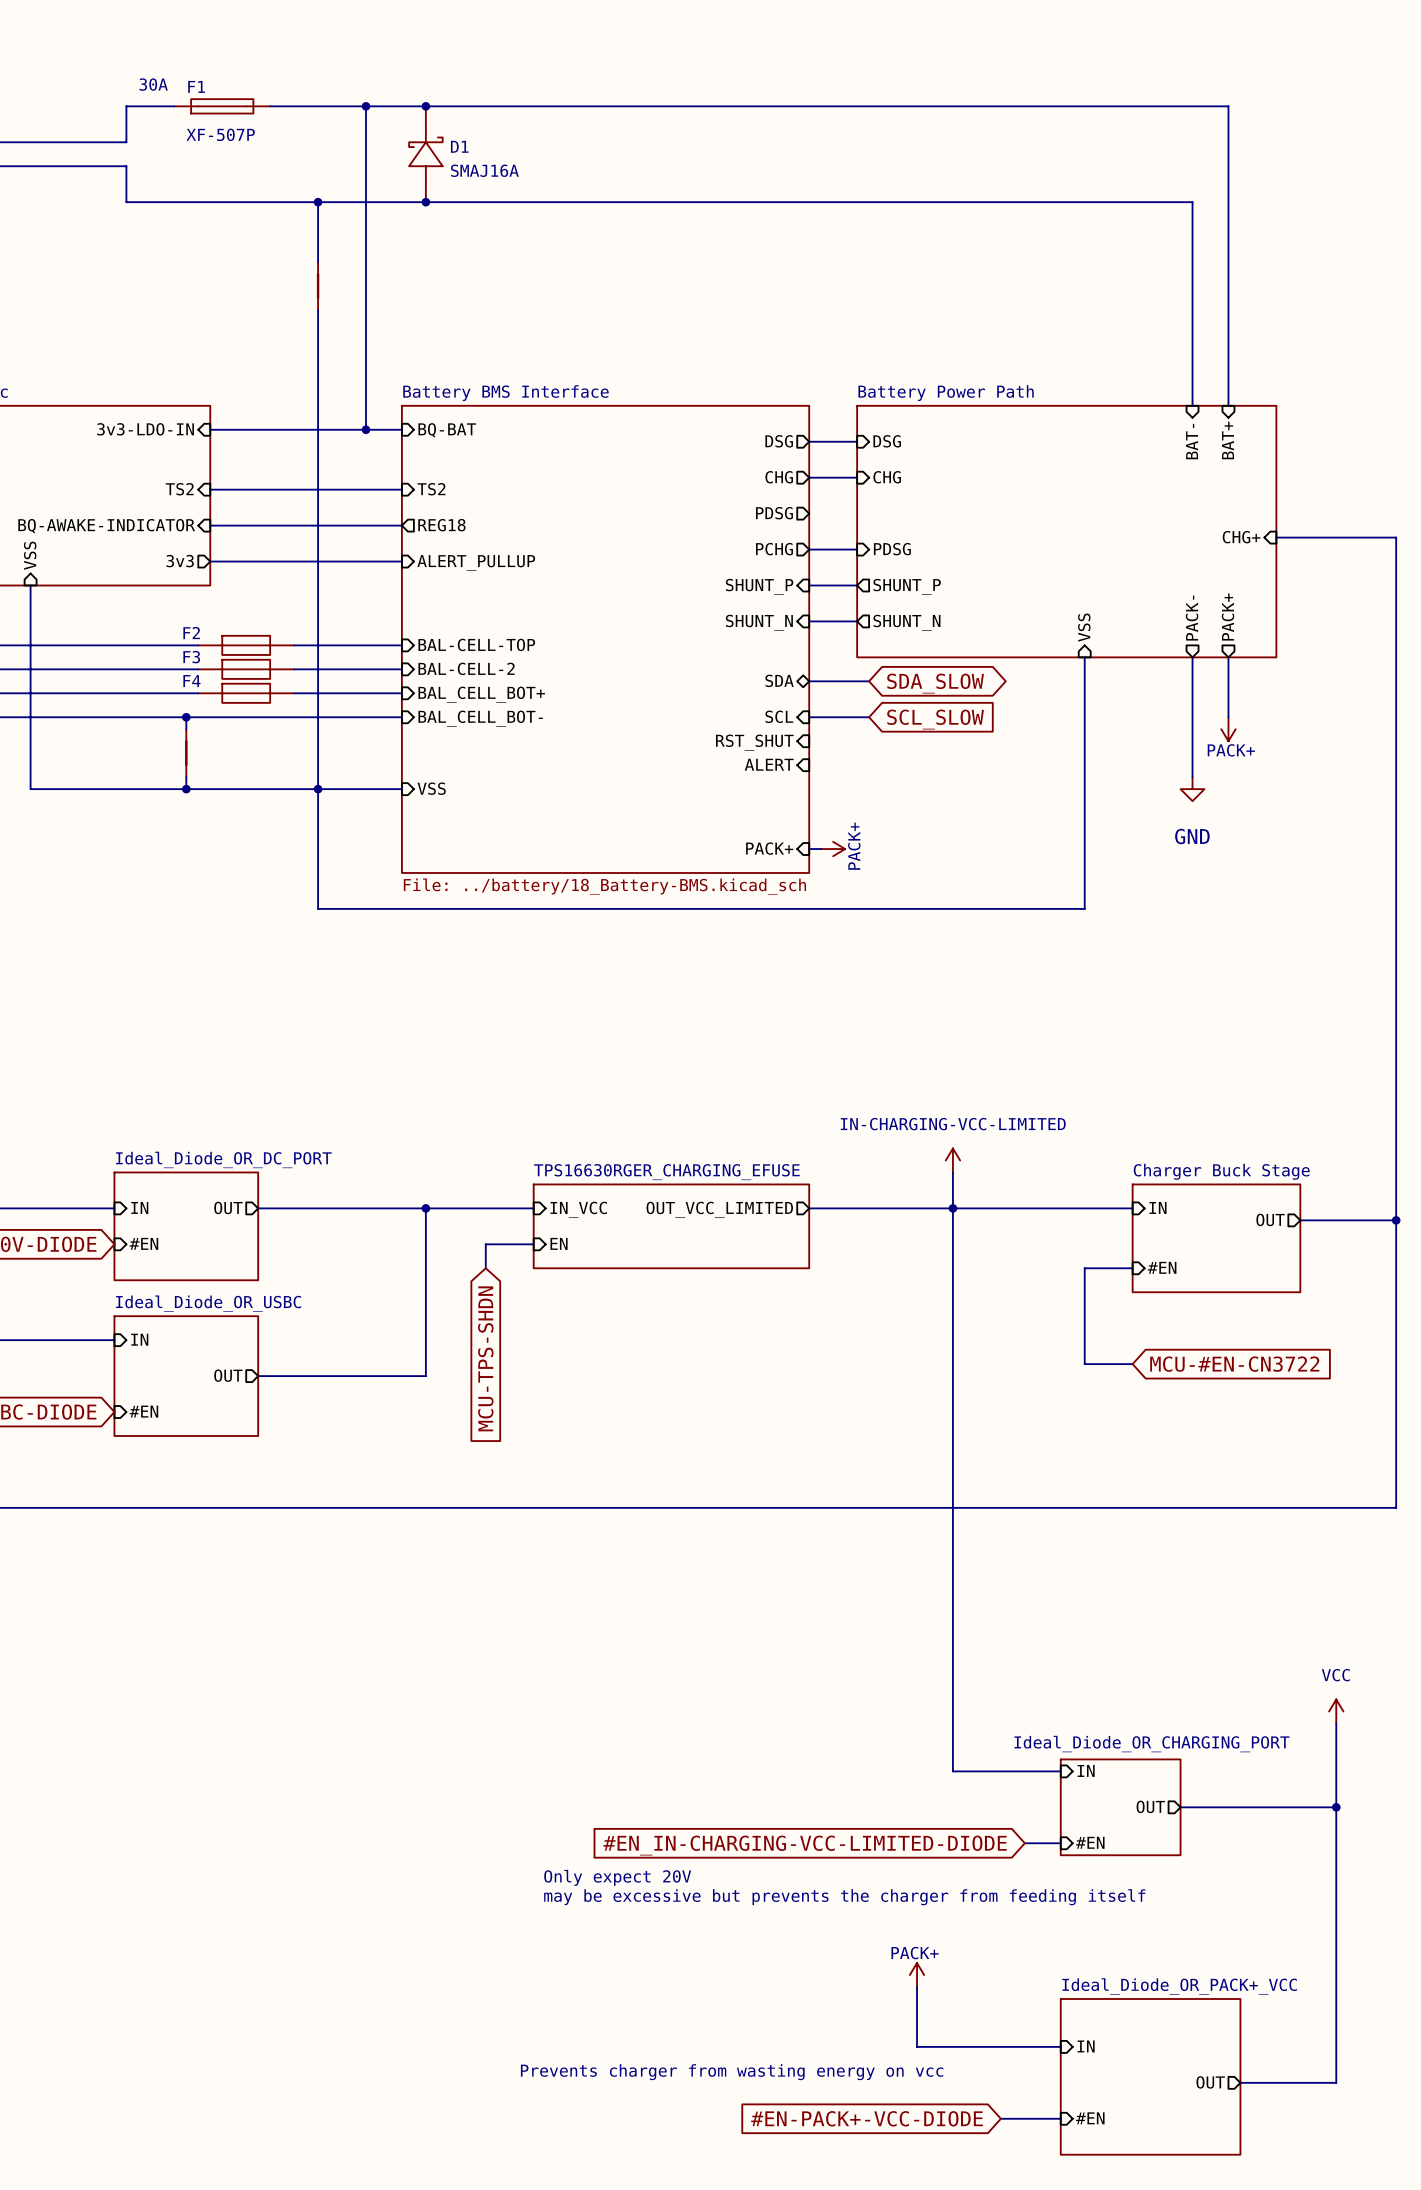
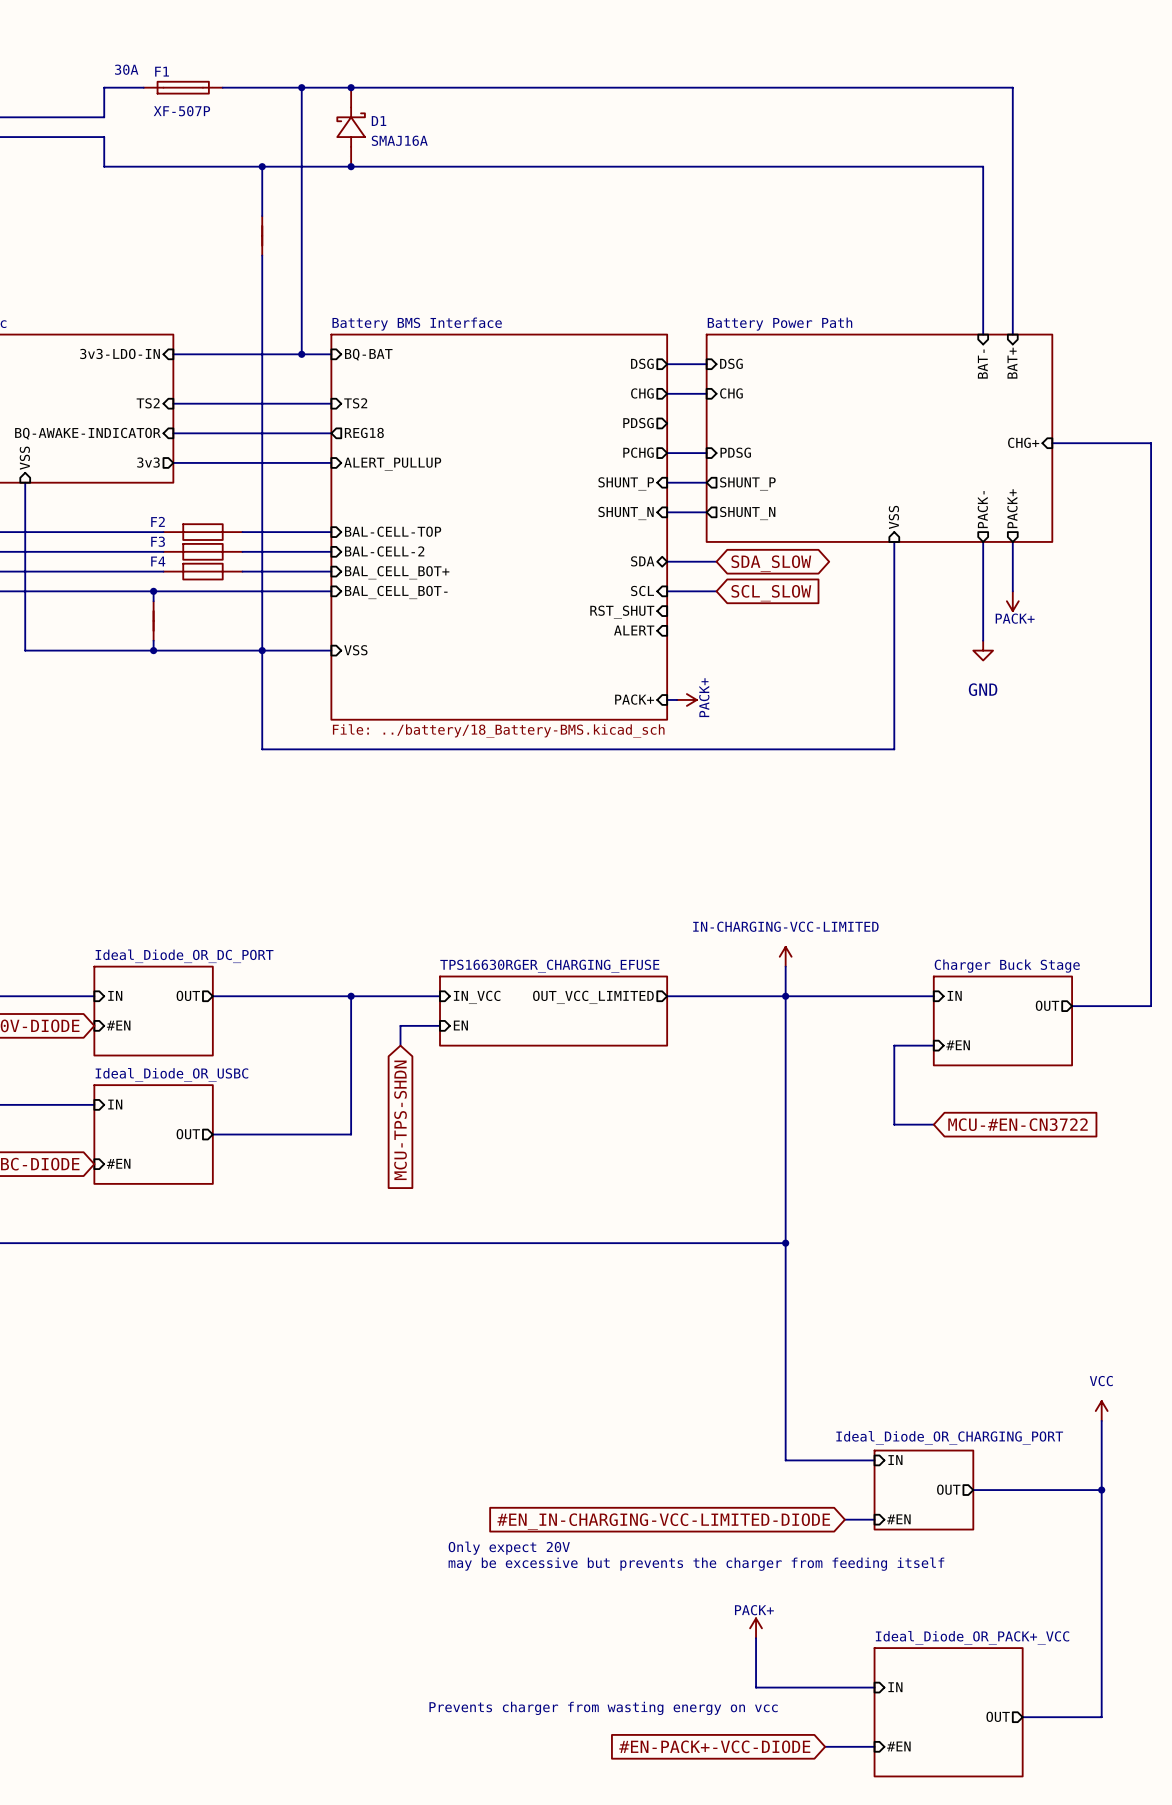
wire: (1396, 1220) (1396, 1507) (952, 1507) -> none
junction: (1396, 1220) -> none
junction: none -> (785, 1243)

